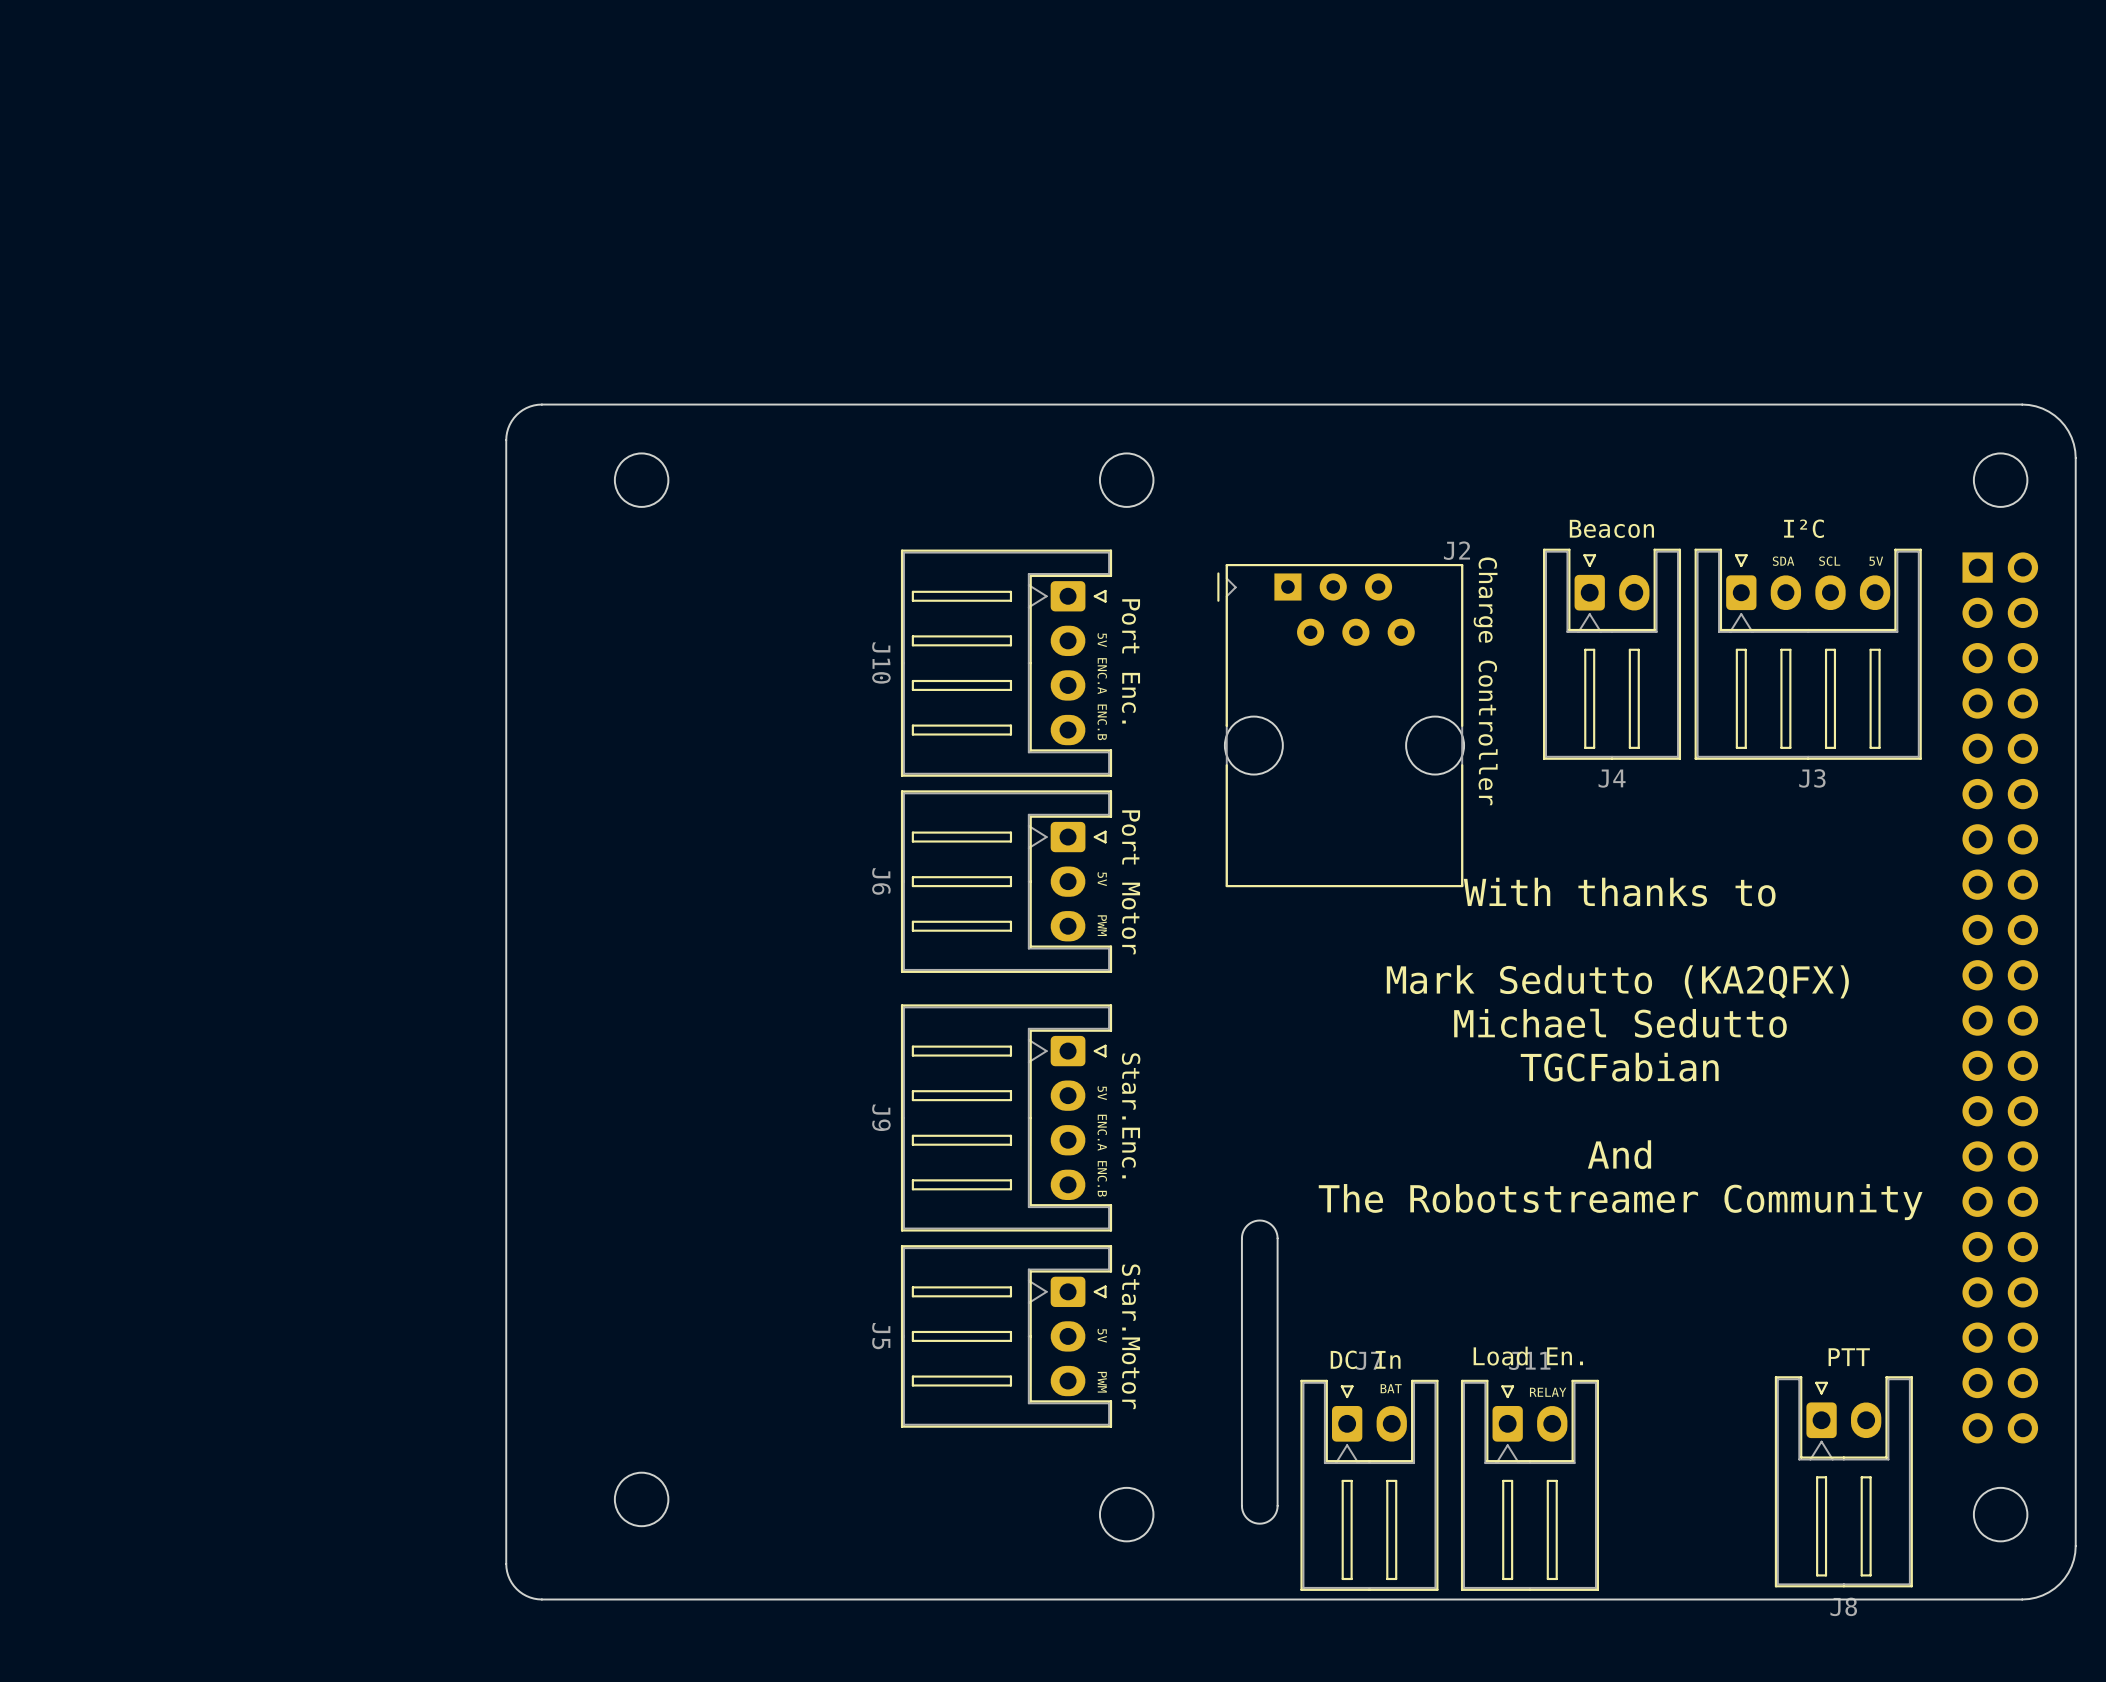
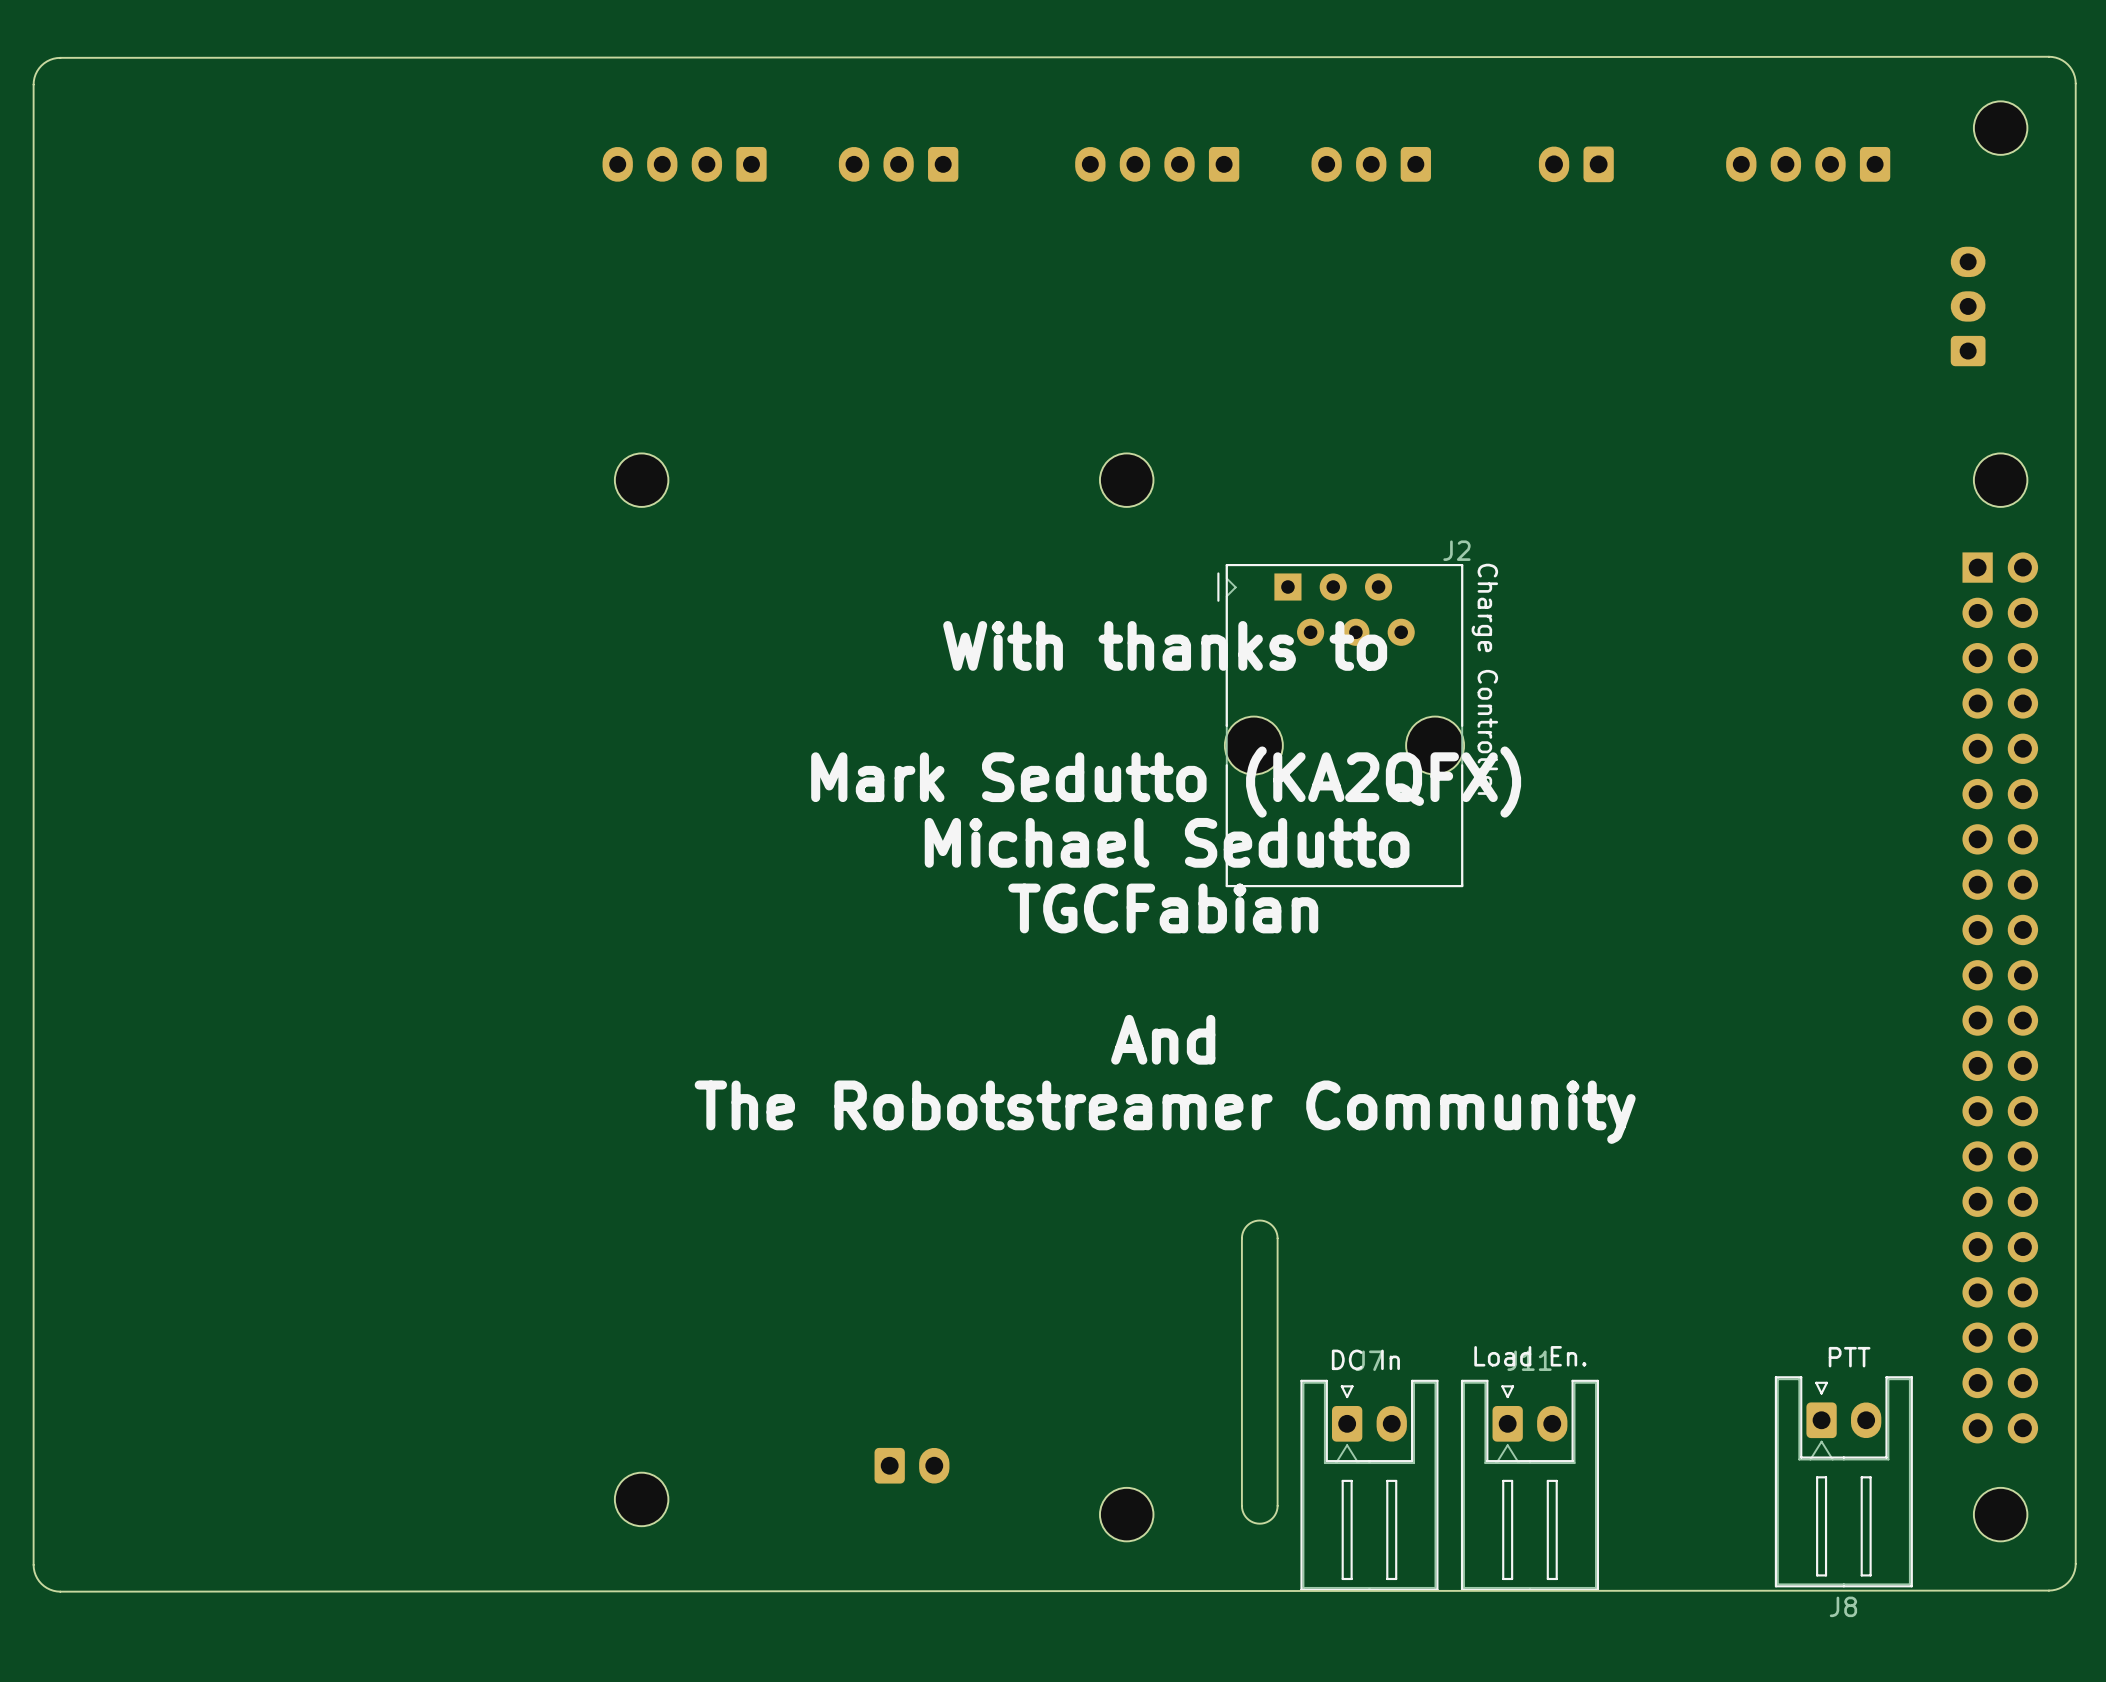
part: none -> (2000, 128)
part: none -> (684, 164)
part: none -> (898, 164)
part: none -> (1157, 164)
part: none -> (1371, 164)
part: none -> (1576, 164)
part: none -> (1808, 164)
part: none -> (1968, 306)
board edge: (2075, 458) (2071, 437) (2060, 420) (2042, 408) (2022, 404) (541, 404) (526, 408) (516, 415) (508, 428) (506, 440) (506, 1563) (511, 1582) (522, 1594) (541, 1599) (2022, 1599) (2042, 1595) (2060, 1583) (2071, 1566) (2075, 1545) -> (2075, 458) (2075, 83) (2070, 67) (2062, 60) (2052, 57) (60, 57) (50, 59) (41, 65) (33, 81) (33, 1564) (37, 1578) (44, 1586) (60, 1591) (2048, 1590) (2062, 1587) (2072, 1577) (2075, 1567) (2075, 1545)
text: SDA (1783, 561) -> none
text: SCL (1829, 561) -> none
text: 5V (1876, 561) -> none
text: 5V (1102, 640) -> none
text: none -> With thanks to (1165, 645)
J4: Beacon (1612, 654) -> none
J3: I²C (1808, 654) -> none
J10: Port Enc. (1006, 663) -> none
text: ENC.A (1102, 676) -> none
text: ENC.B (1102, 722) -> none
text: none -> Mark Sedutto (KA2QFX) (1166, 782)
text: none -> Michael Sedutto (1167, 842)
text: 5V (1102, 879) -> none
J6: Port Motor (1006, 881) -> none
text: With thanks to (1619, 892) -> none
text: none -> TGCFabian (1163, 908)
text: PWM (1102, 925) -> none
text: Mark Sedutto (KA2QFX) (1617, 981) -> none
text: Michael Sedutto (1620, 1023) -> none
text: none -> And (1163, 1039)
text: TGCFabian (1619, 1067) -> none
text: 5V (1102, 1093) -> none
text: none -> The Robotstreamer Community (1165, 1112)
J9: Star.Enc. (1006, 1117) -> none
text: ENC.A (1102, 1132) -> none
text: And (1619, 1154) -> none
text: ENC.B (1102, 1178) -> none
text: The Robotstreamer Community (1620, 1202) -> none
text: 5V (1102, 1335) -> none
J5: Star.Motor (1006, 1336) -> none
text: PWM (1102, 1382) -> none
text: BAT (1391, 1388) -> none
text: RELAY (1548, 1392) -> none
part: none -> (911, 1465)

